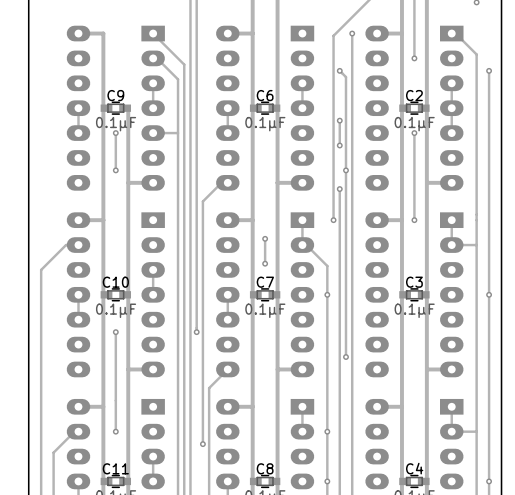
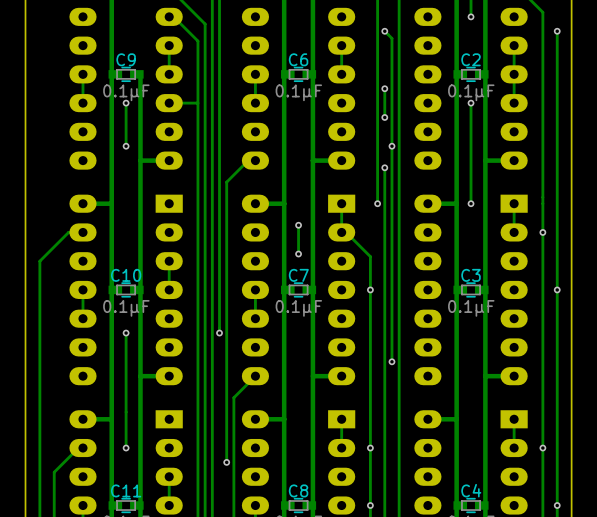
track: (476, 245) (451, 245) -> none
via: none -> (542, 232)
track: (476, 431) (451, 431) -> none
via: none -> (542, 448)

